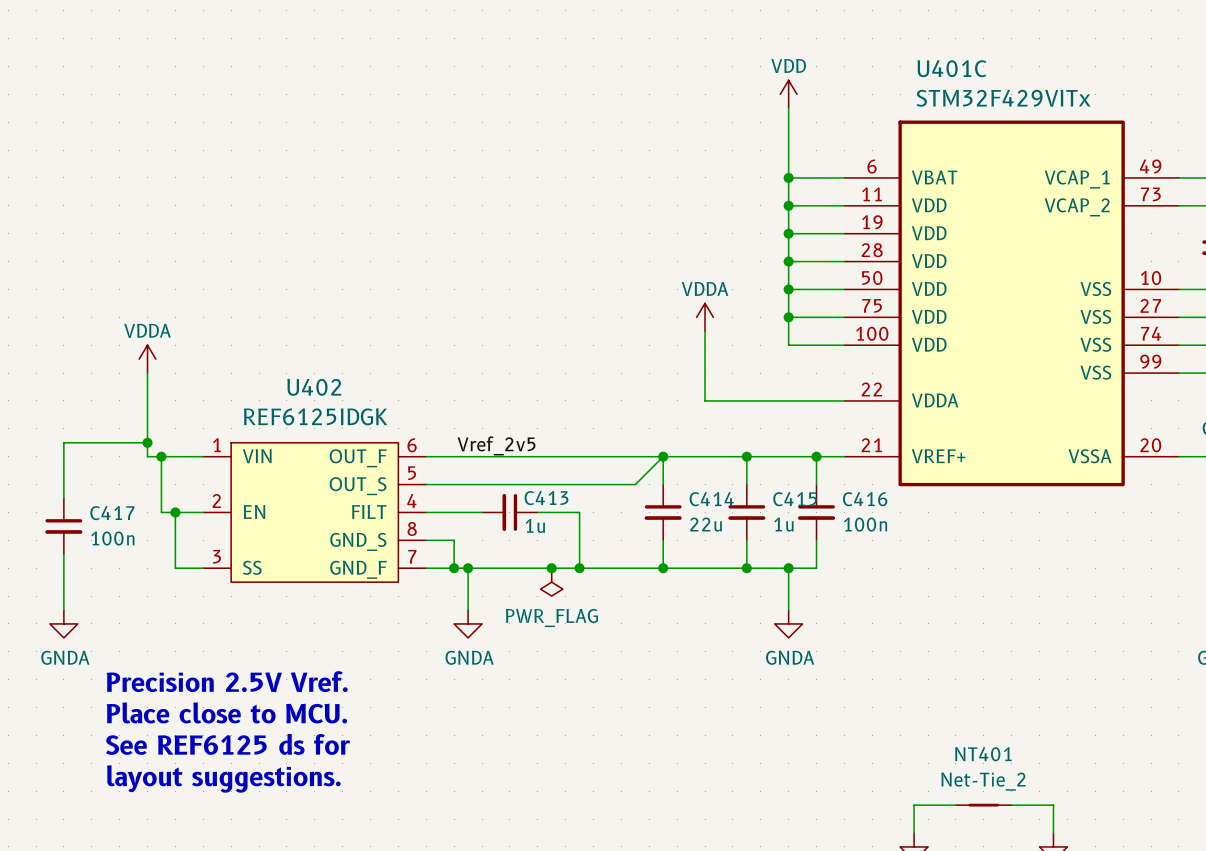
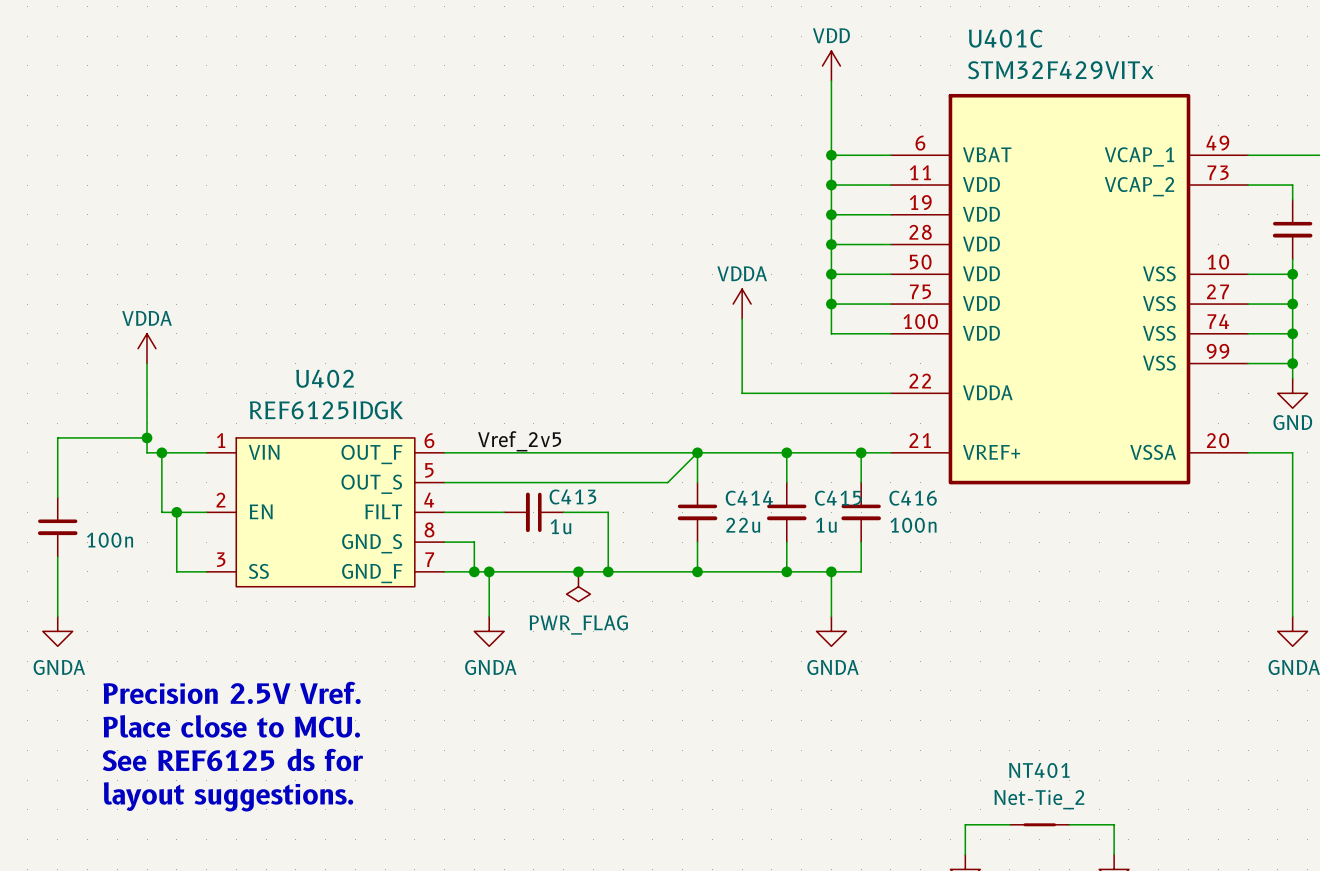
C417 name: C417 (112, 513) -> none

